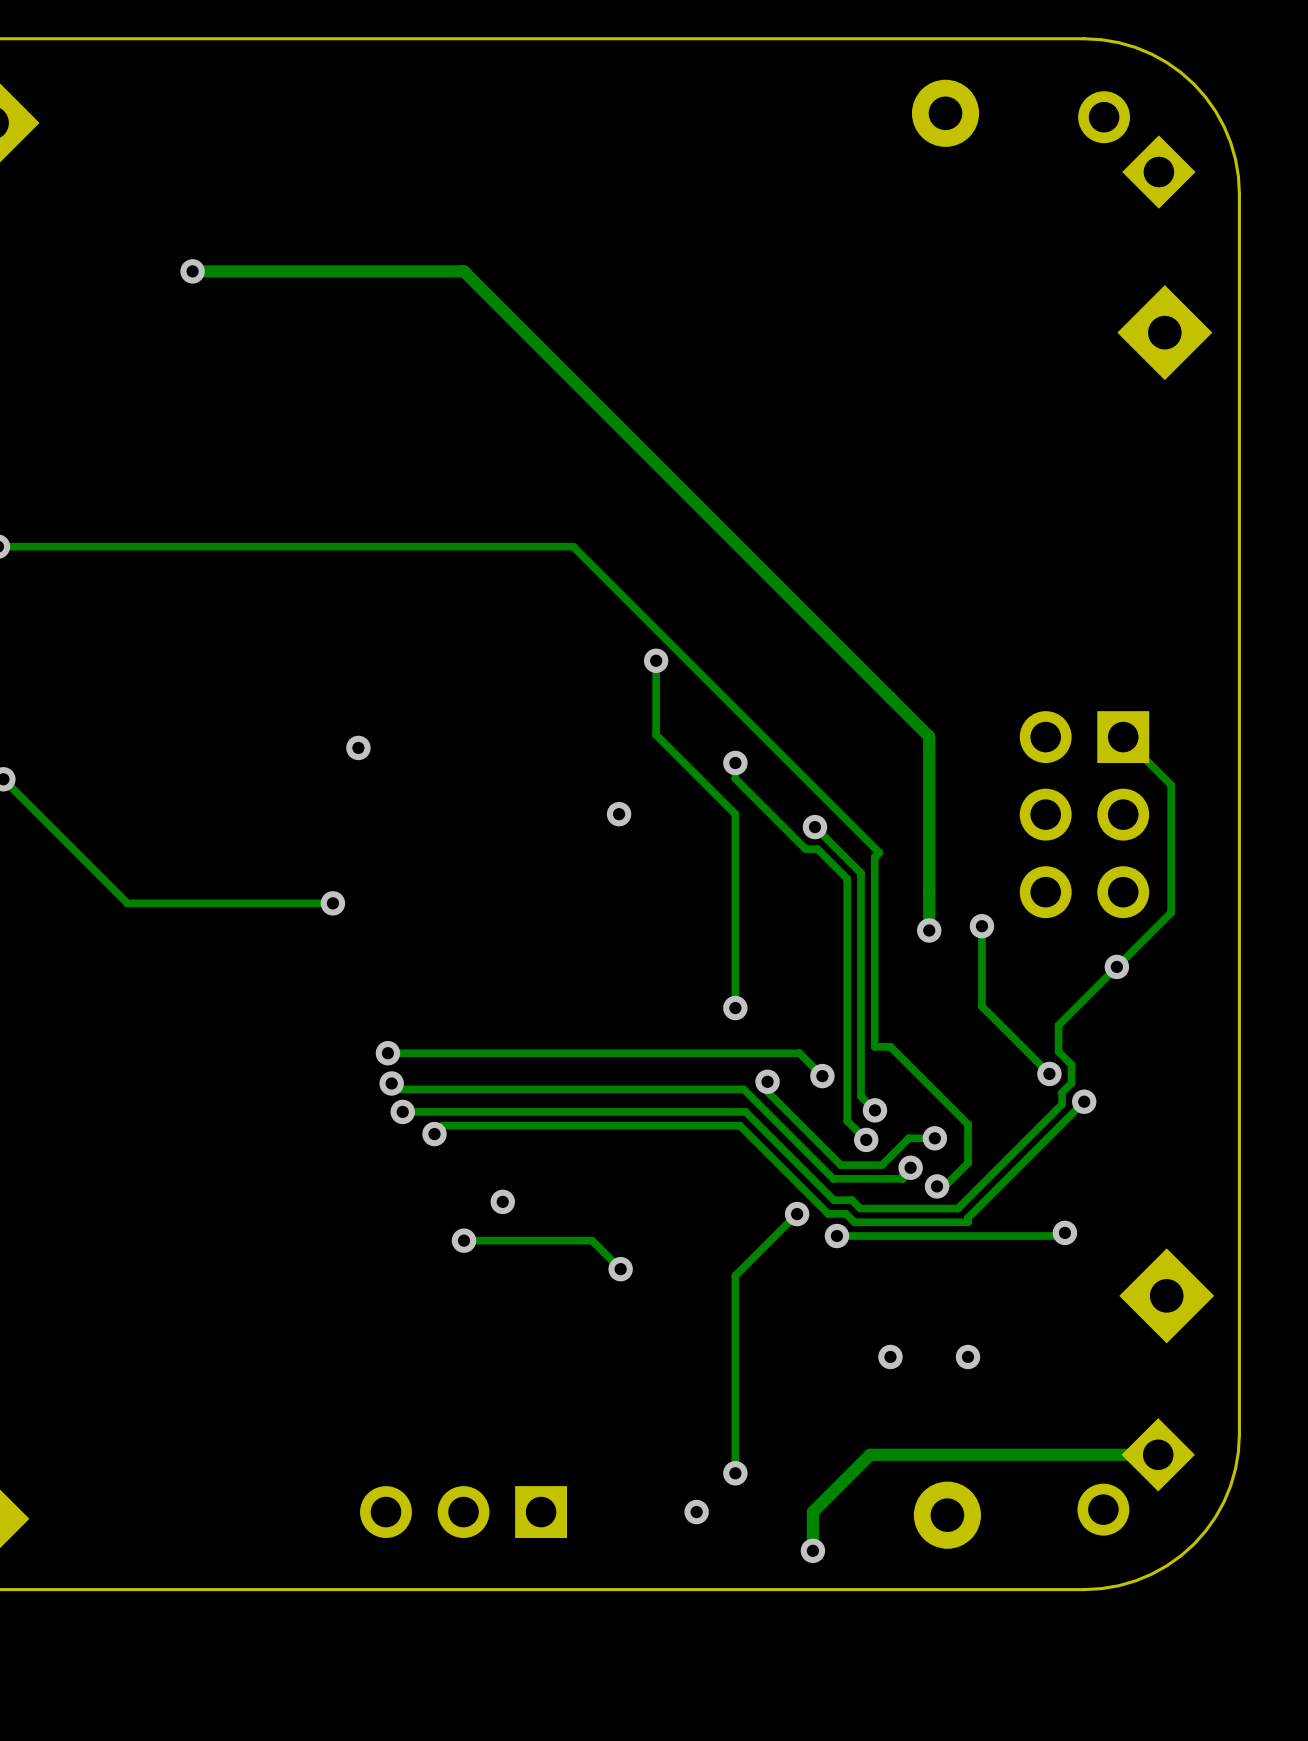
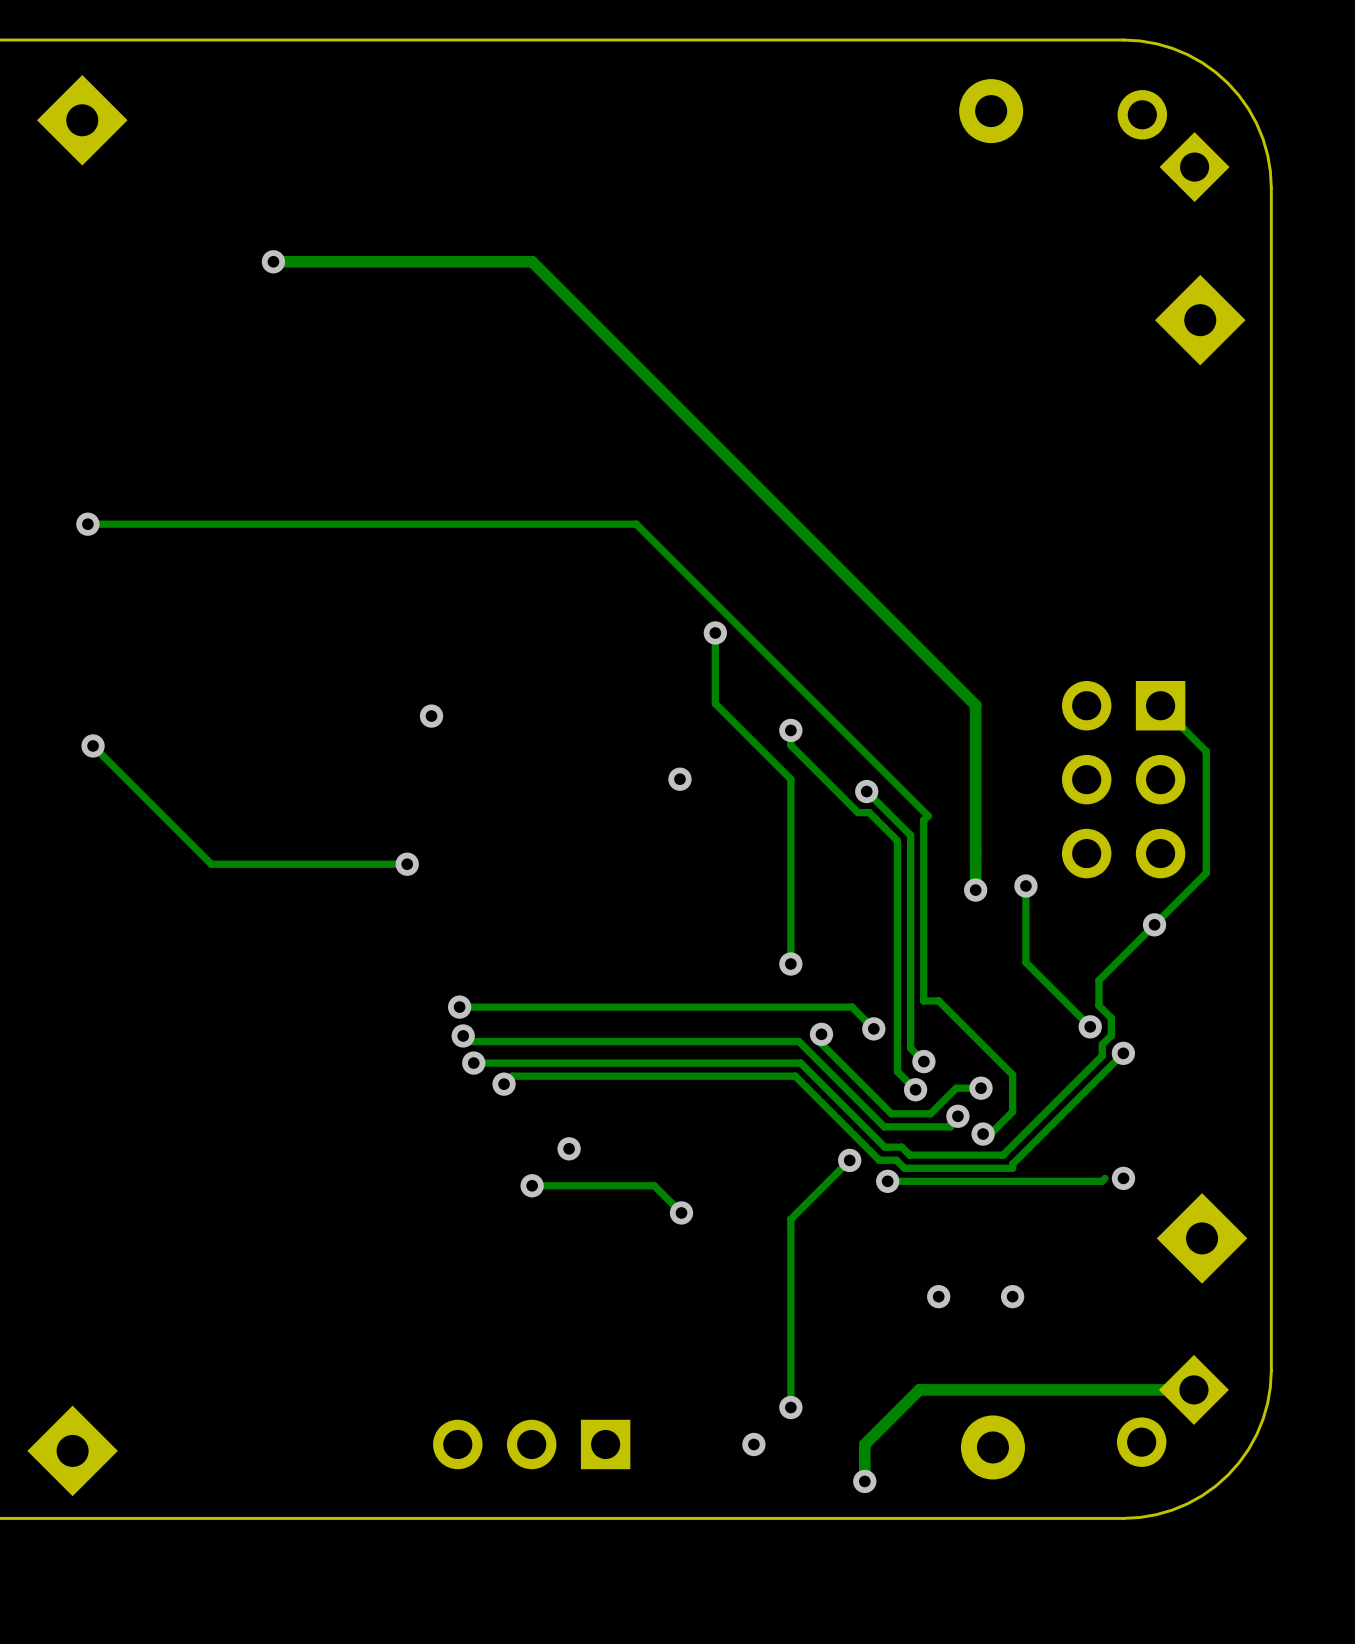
via position: (1064, 1232) -> (1123, 1178)

